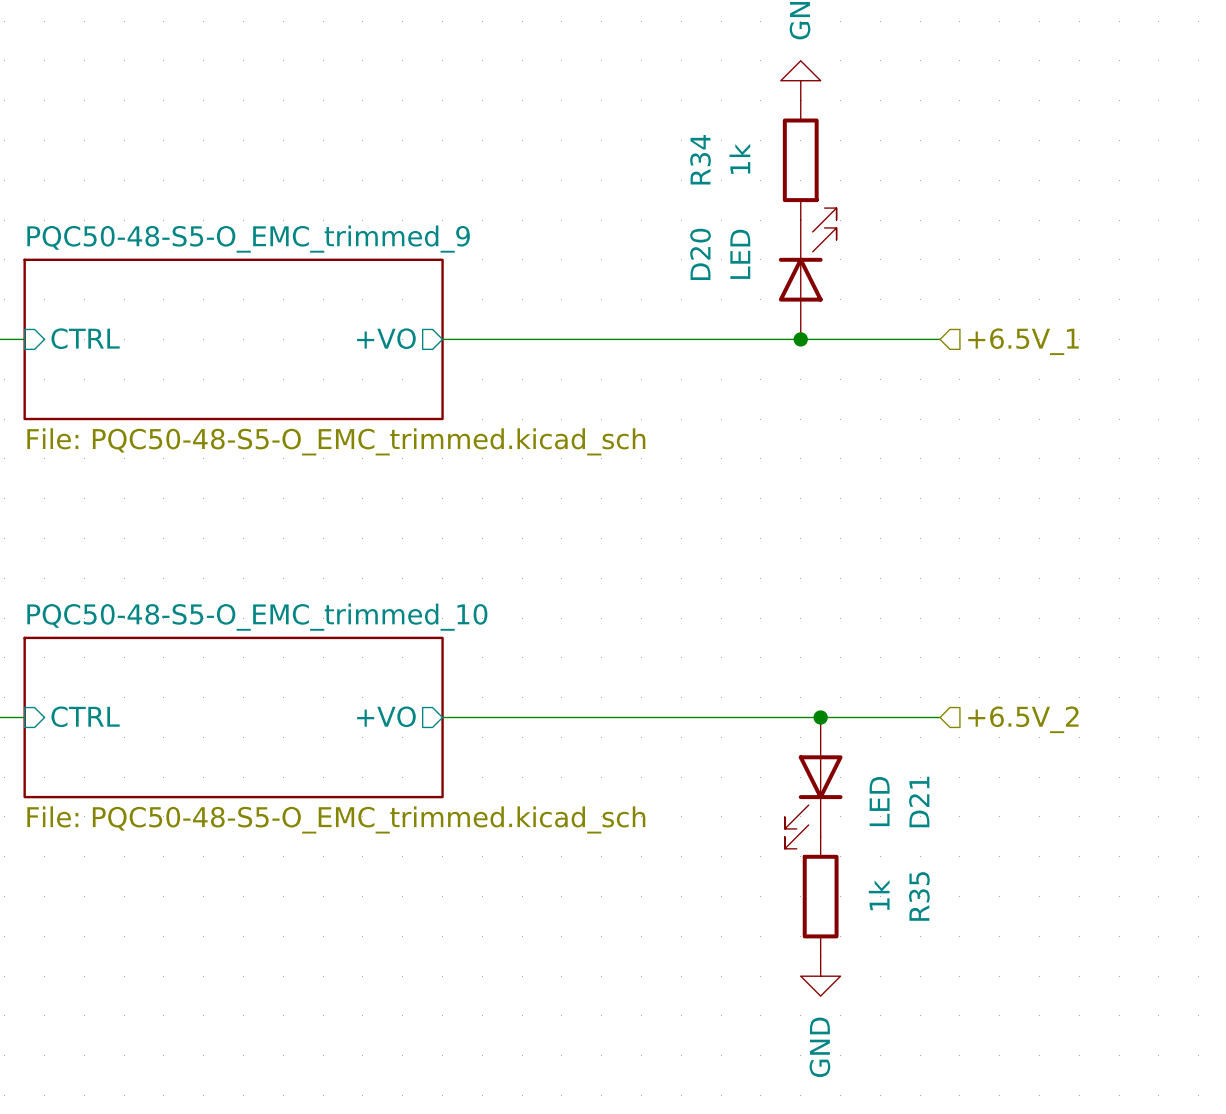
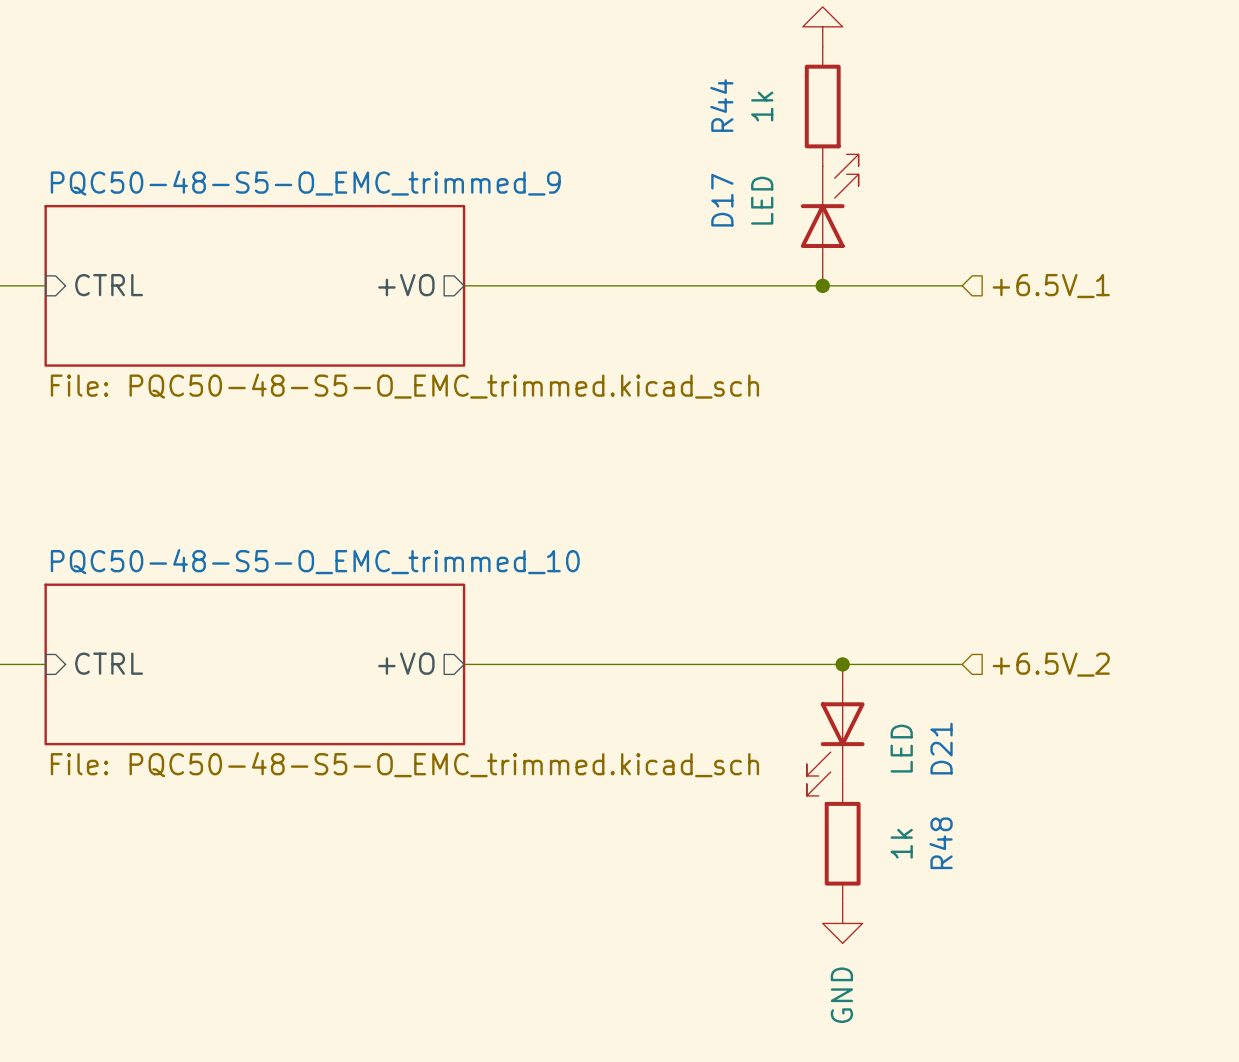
R34 name: R34 (700, 159) -> R44 (721, 105)
D20 name: D20 (700, 254) -> D17 (722, 200)
R35 name: R35 (919, 896) -> R48 (941, 843)

